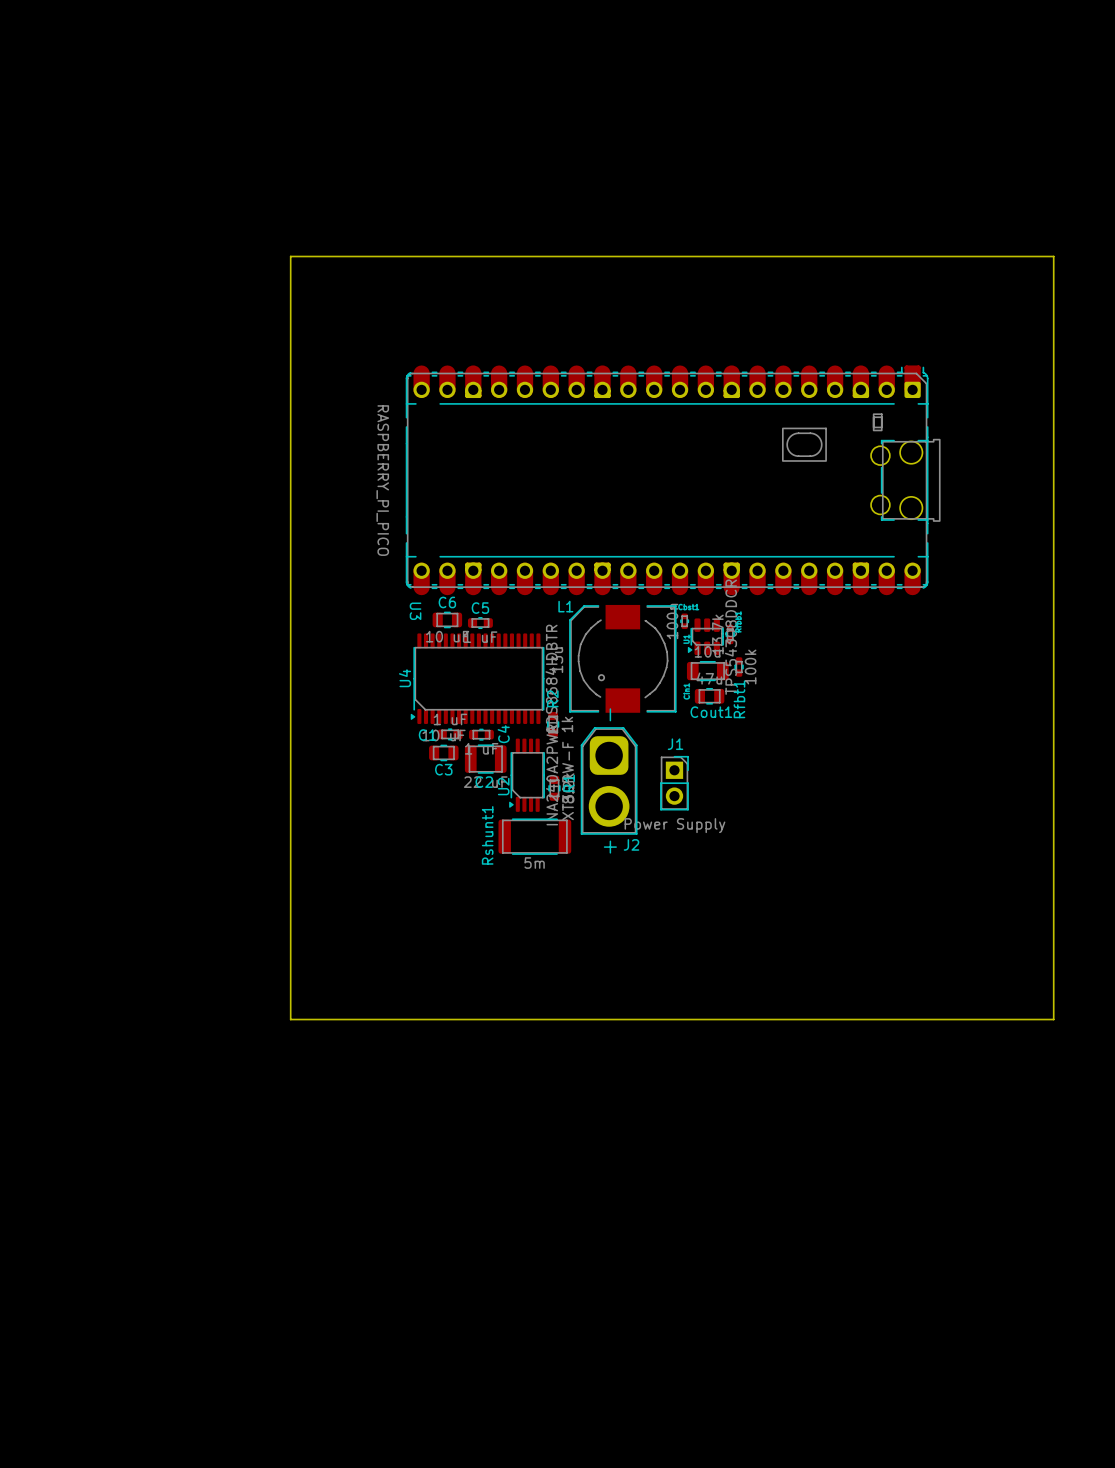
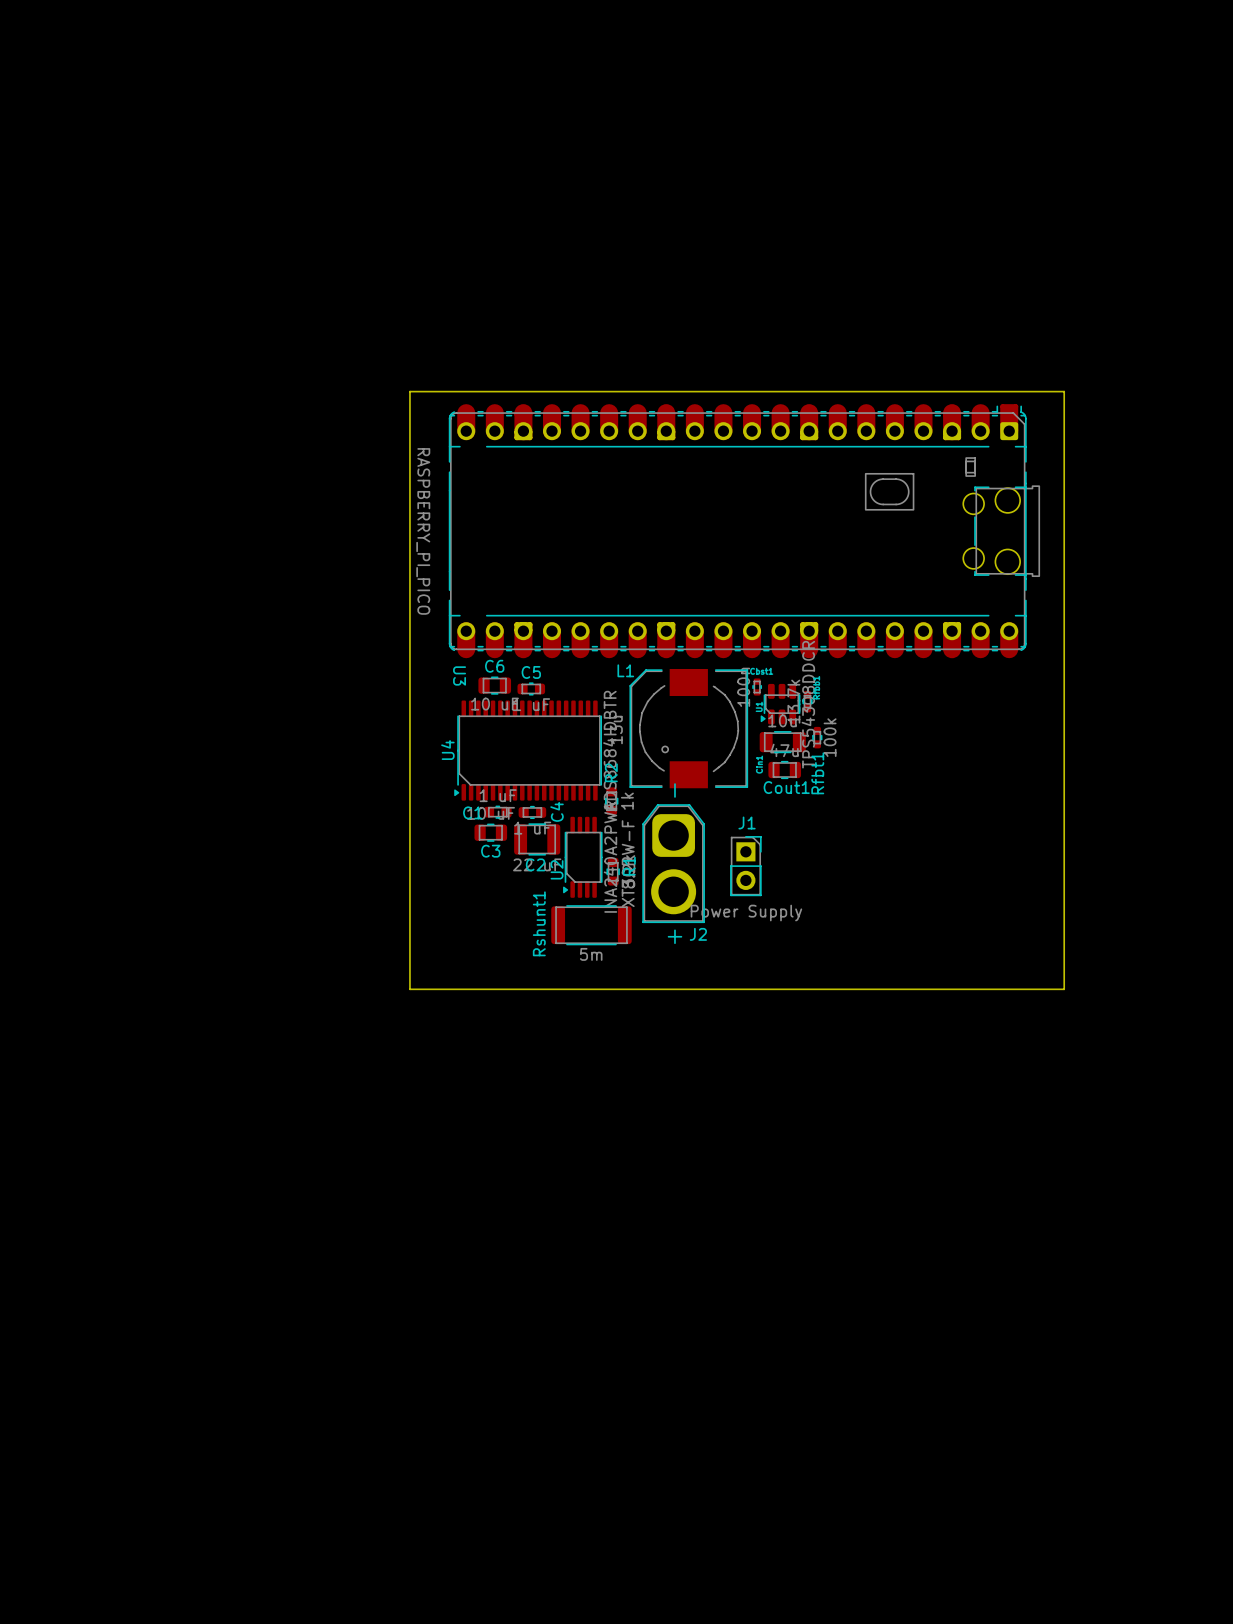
board edge: (290, 256) (1053, 256) (1053, 1019) (290, 1019) (290, 256) -> (409, 391) (409, 989) (1064, 989) (1064, 391) (409, 391)

